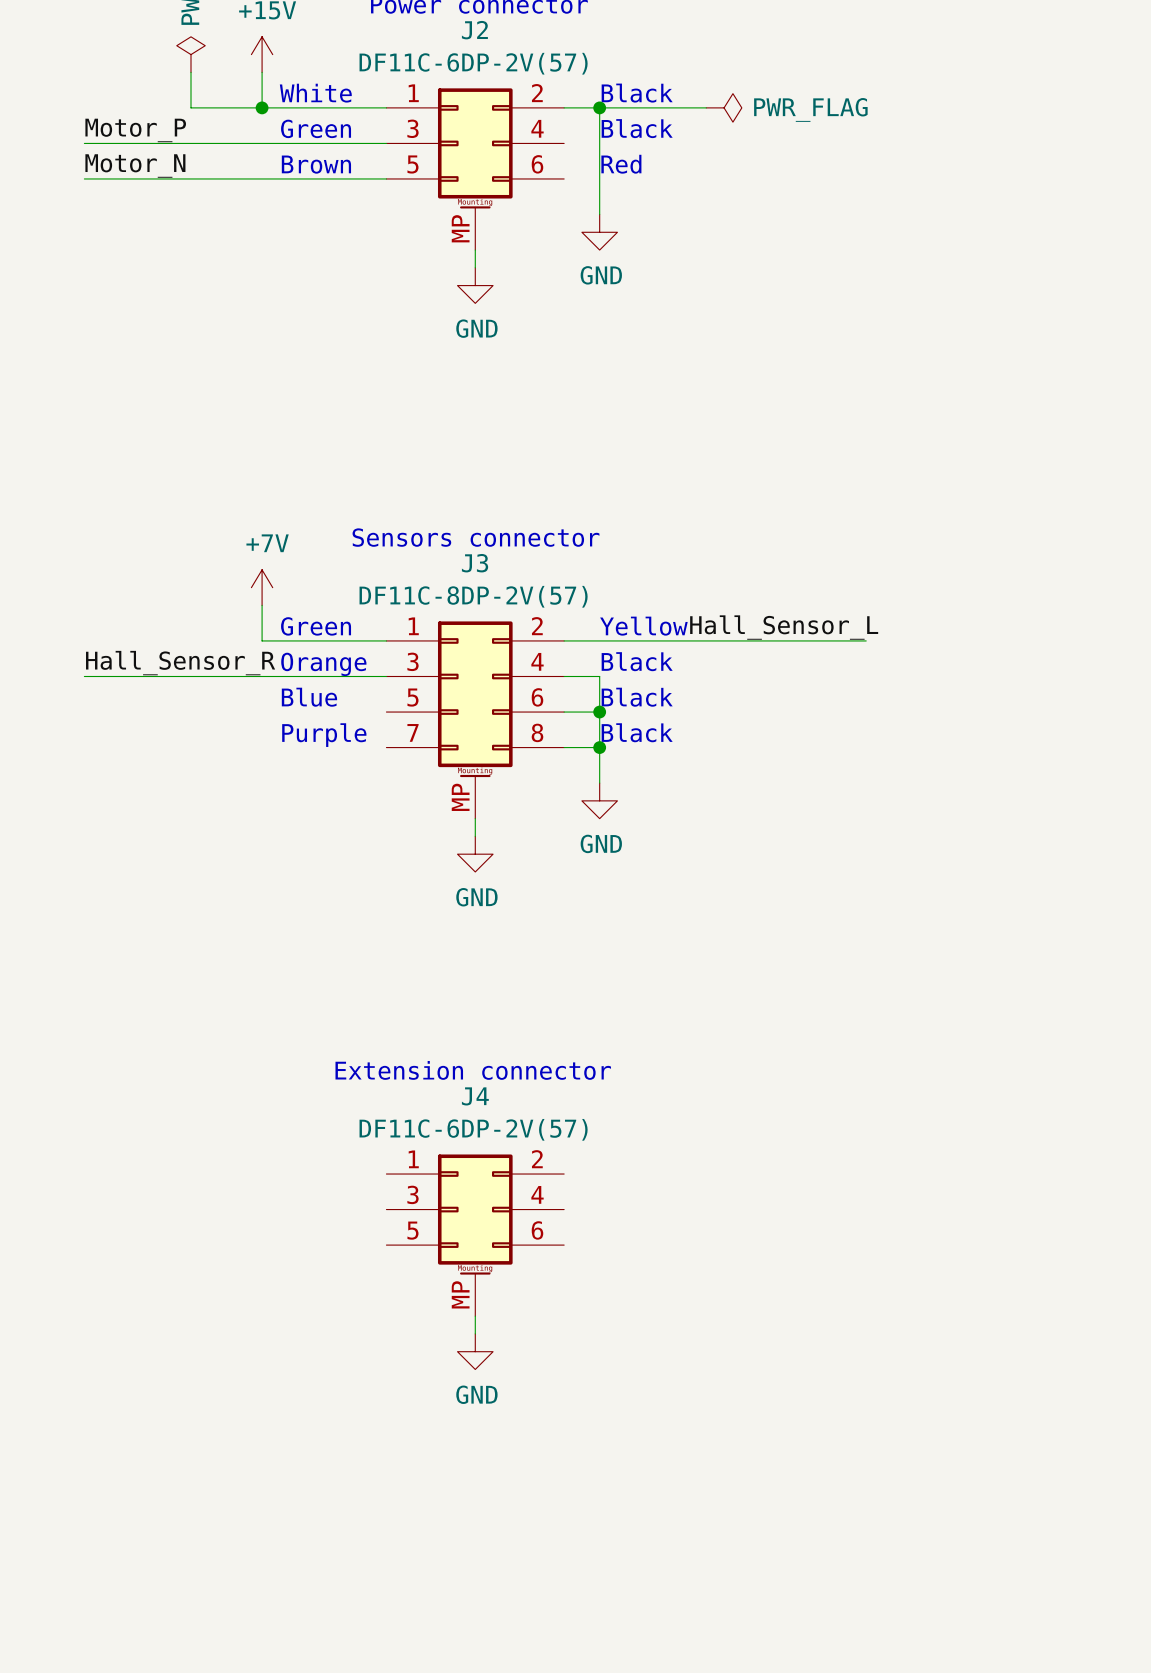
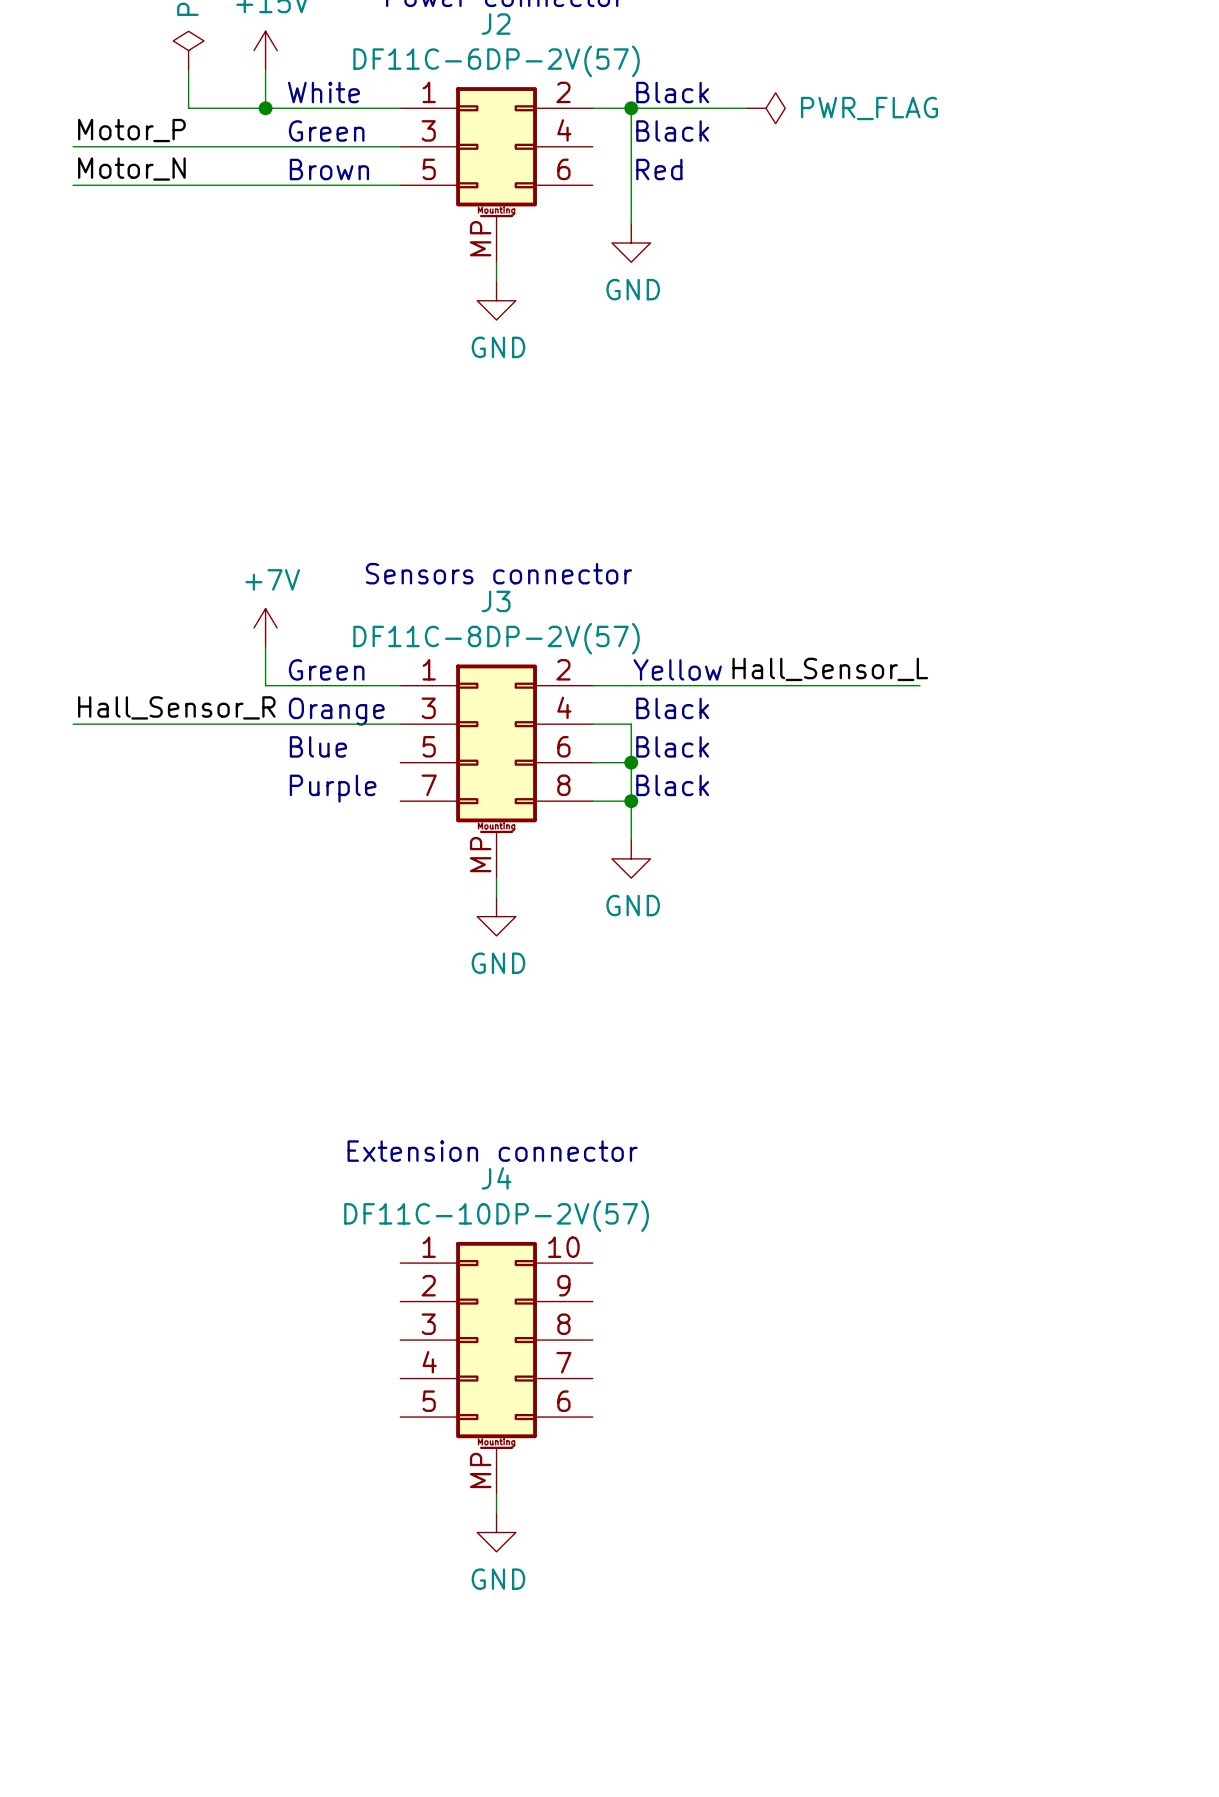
J4 value: DF11C-6DP-2V(57) (473, 1129) -> DF11C-10DP-2V(57) (496, 1216)
J4 symbol: [386, 1154, 565, 1317] -> [400, 1241, 593, 1495]
power symbol position: GND (475, 1351) -> GND (496, 1532)

